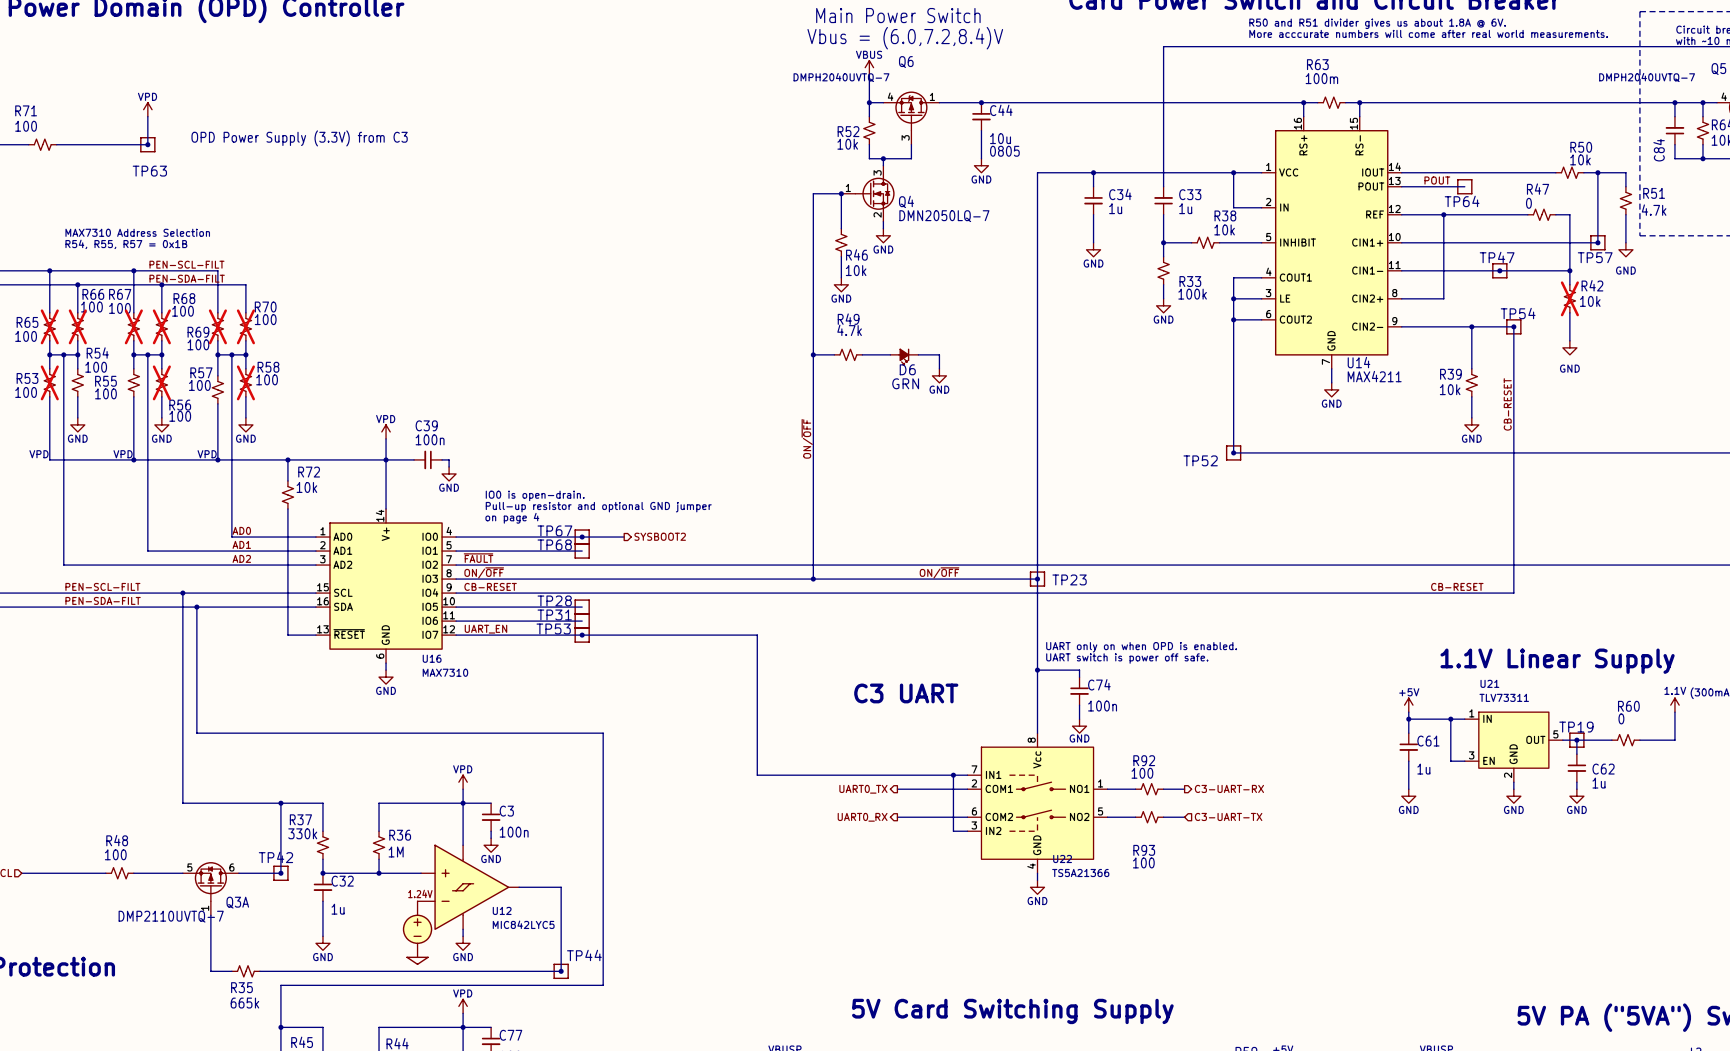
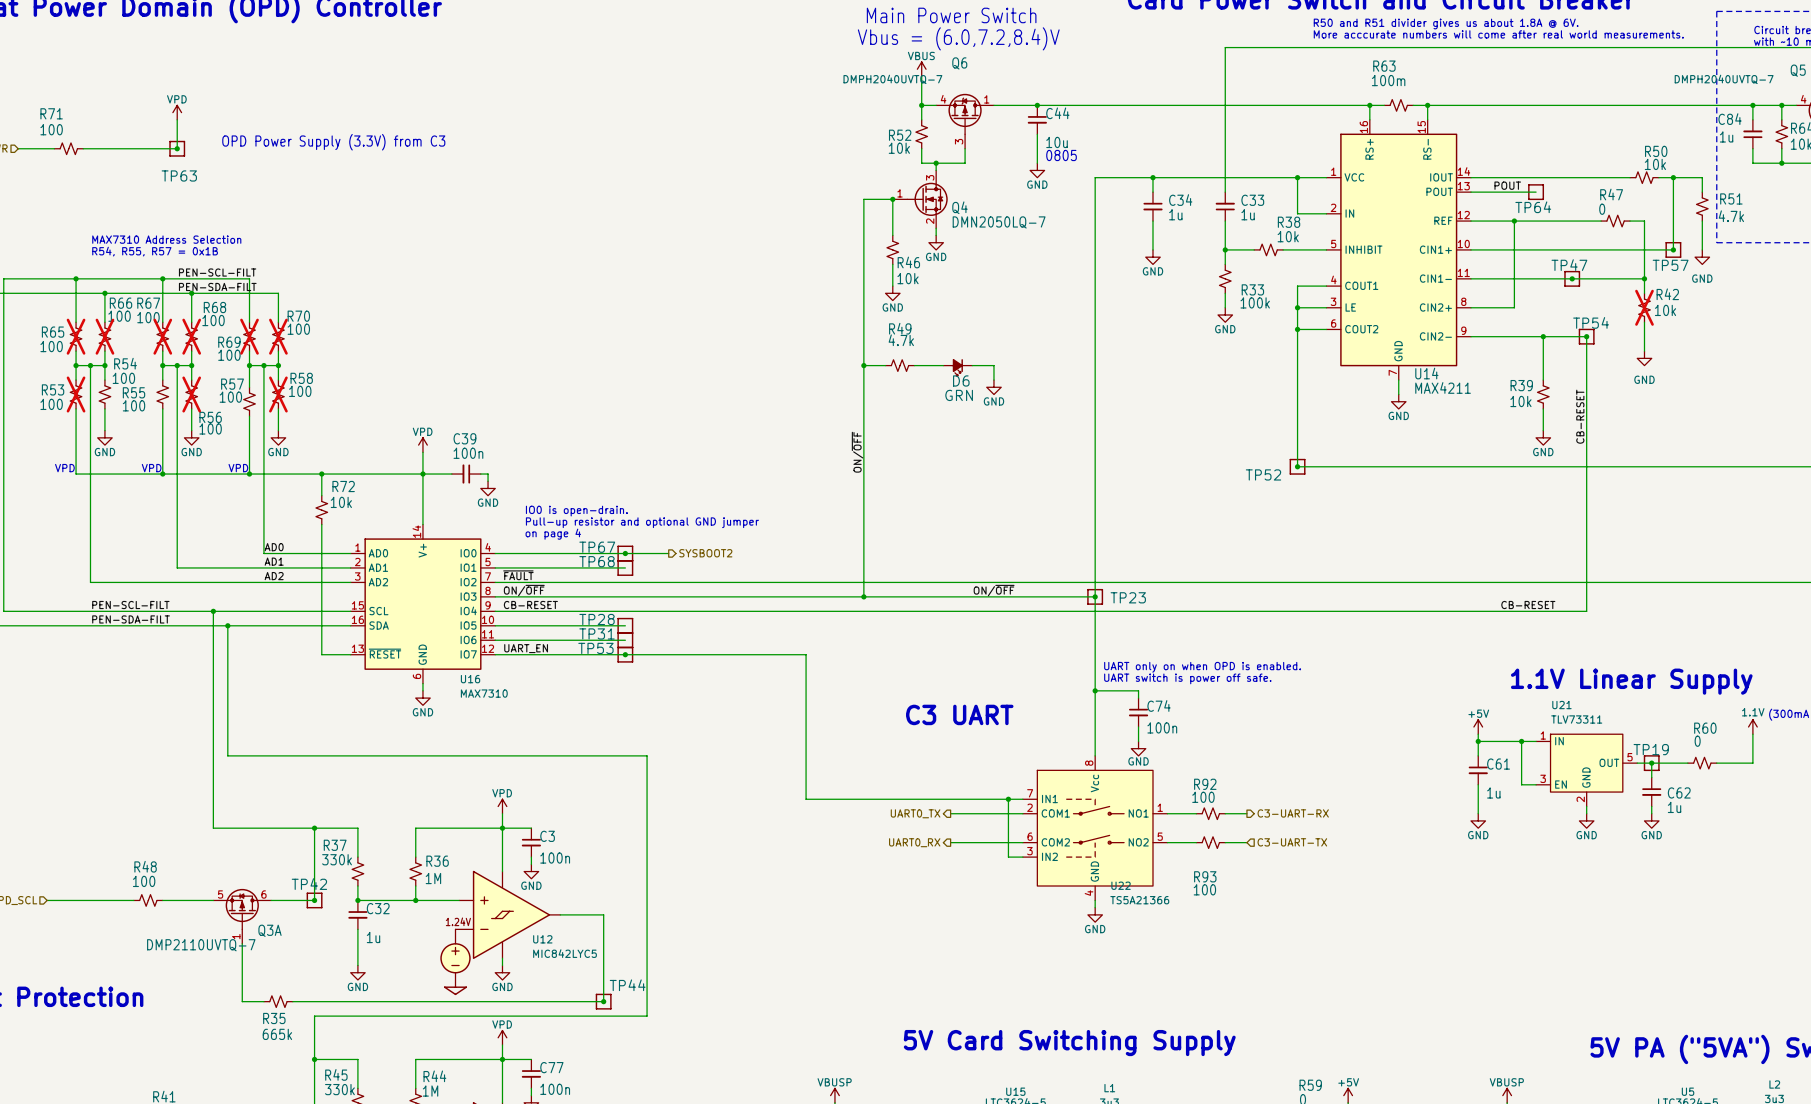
C84 value: none -> 1u (1726, 136)
C84 name rotation: 0° (1659, 150) -> 90° clockwise (1730, 119)
C84 name position: C84 (1659, 150) -> C84 (1730, 119)

